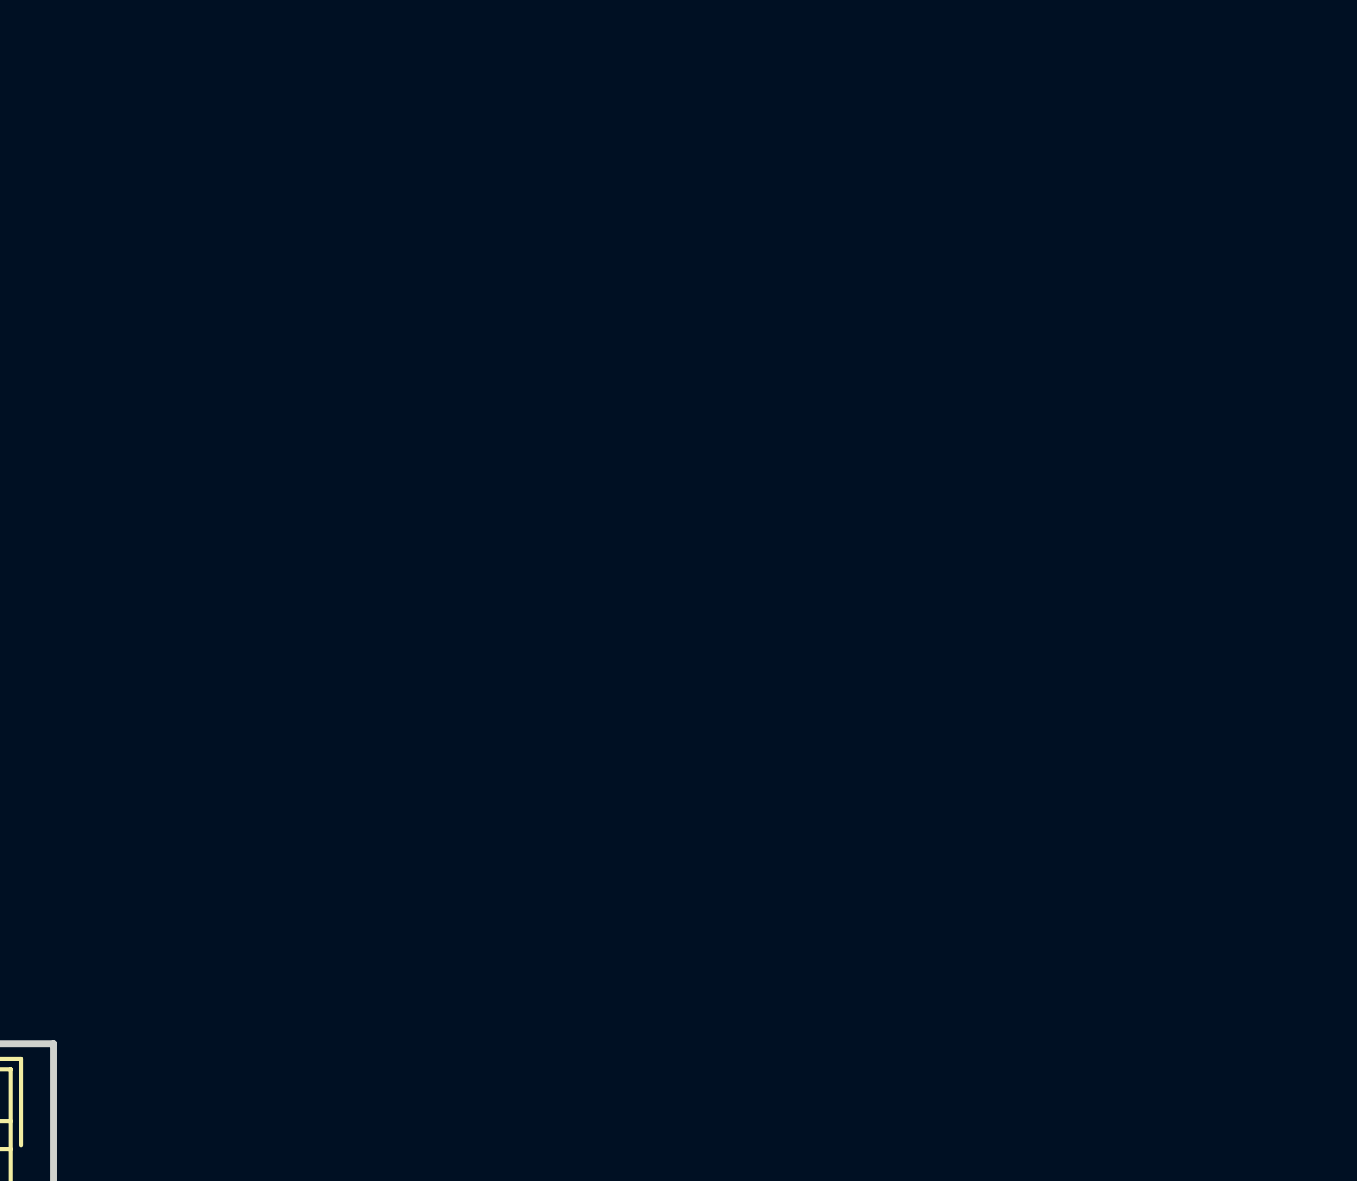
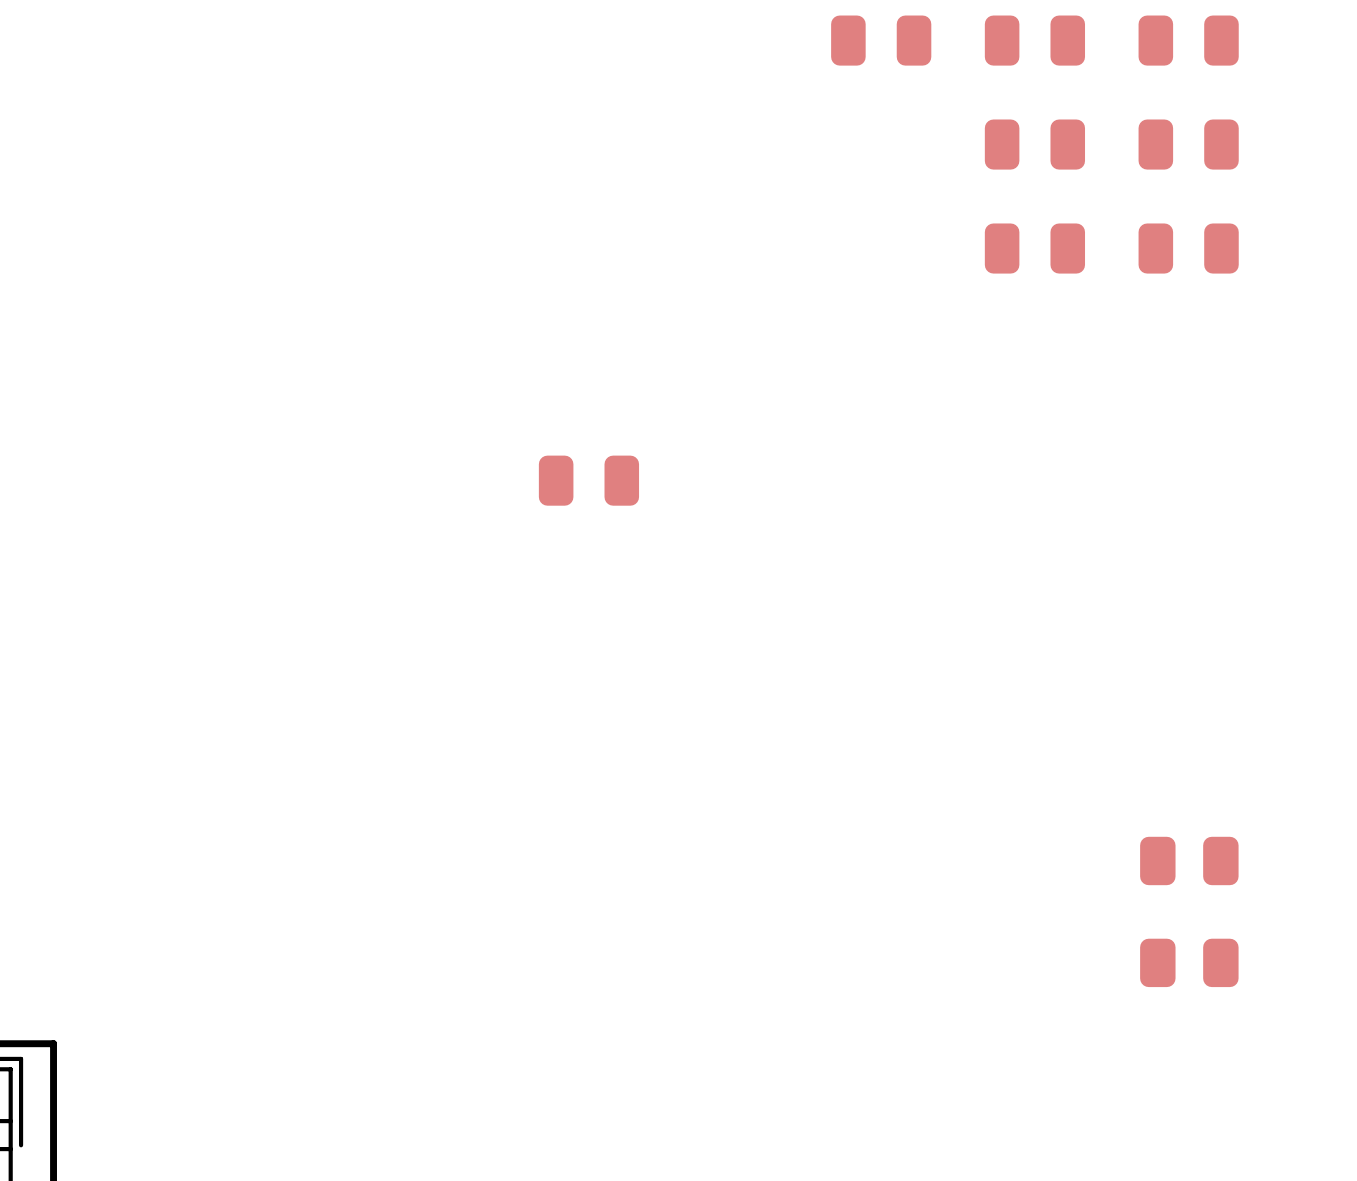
part: none -> (881, 40)
part: none -> (1034, 40)
part: none -> (1188, 40)
part: none -> (1034, 144)
part: none -> (1188, 144)
part: none -> (1034, 248)
part: none -> (1188, 248)
part: none -> (588, 480)
part: none -> (1189, 860)
part: none -> (1189, 962)

